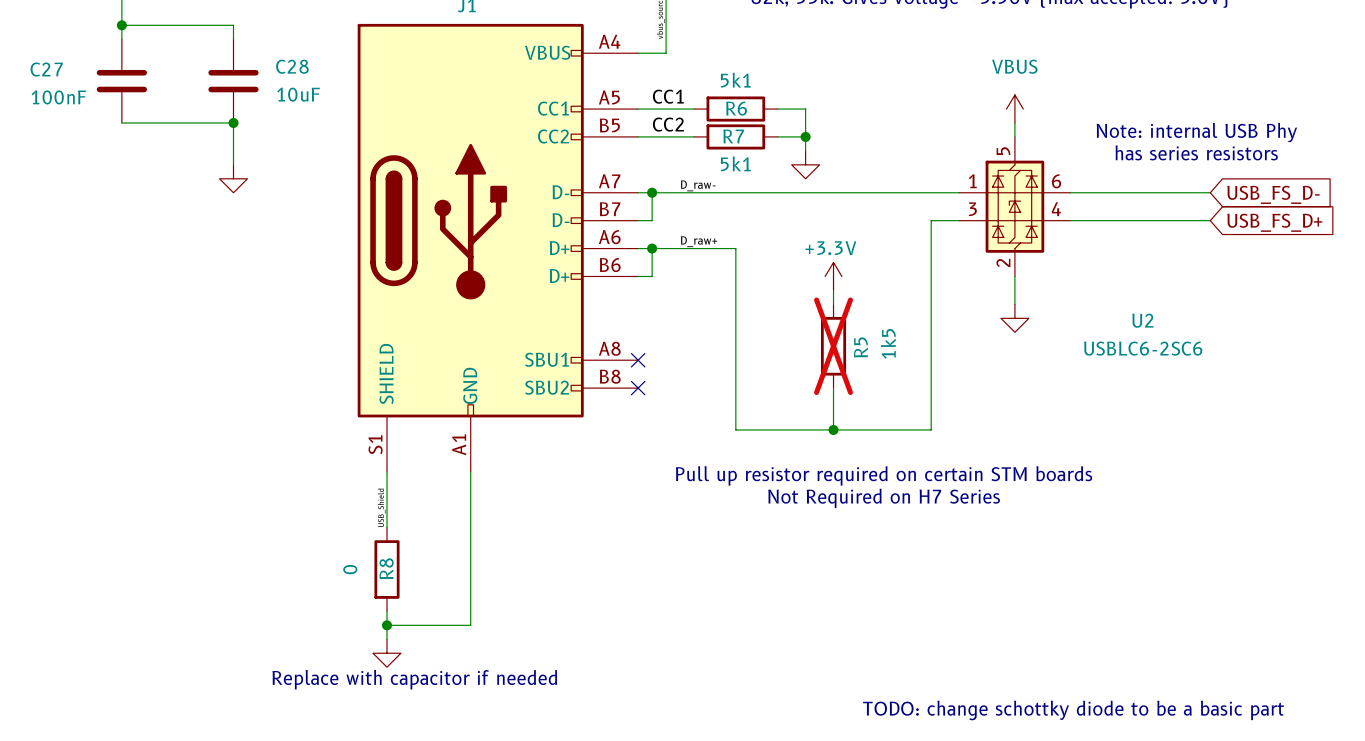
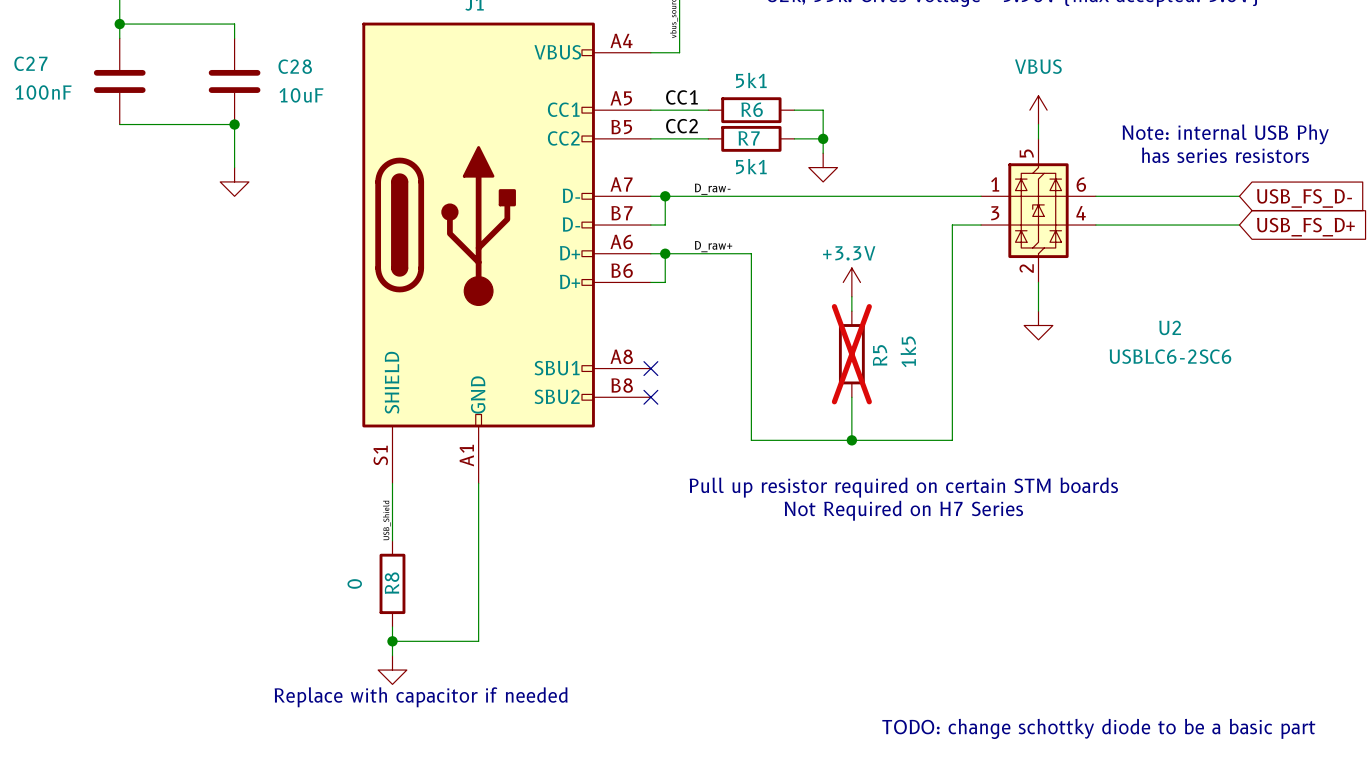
C27 name position: C27 (46, 69) -> C27 (30, 63)
C27 value position: 100nF (58, 97) -> 100nF (43, 92)

